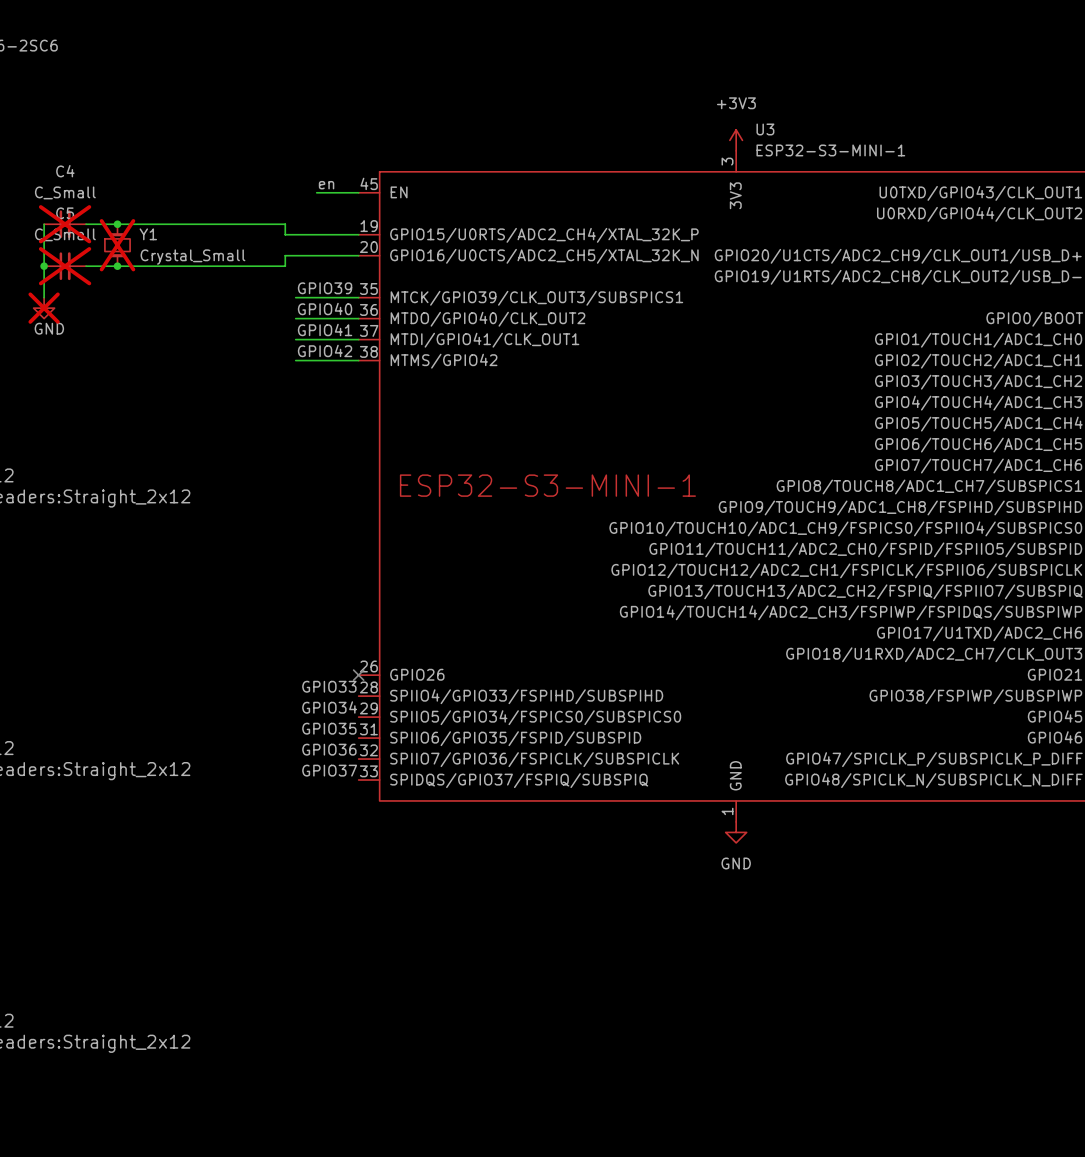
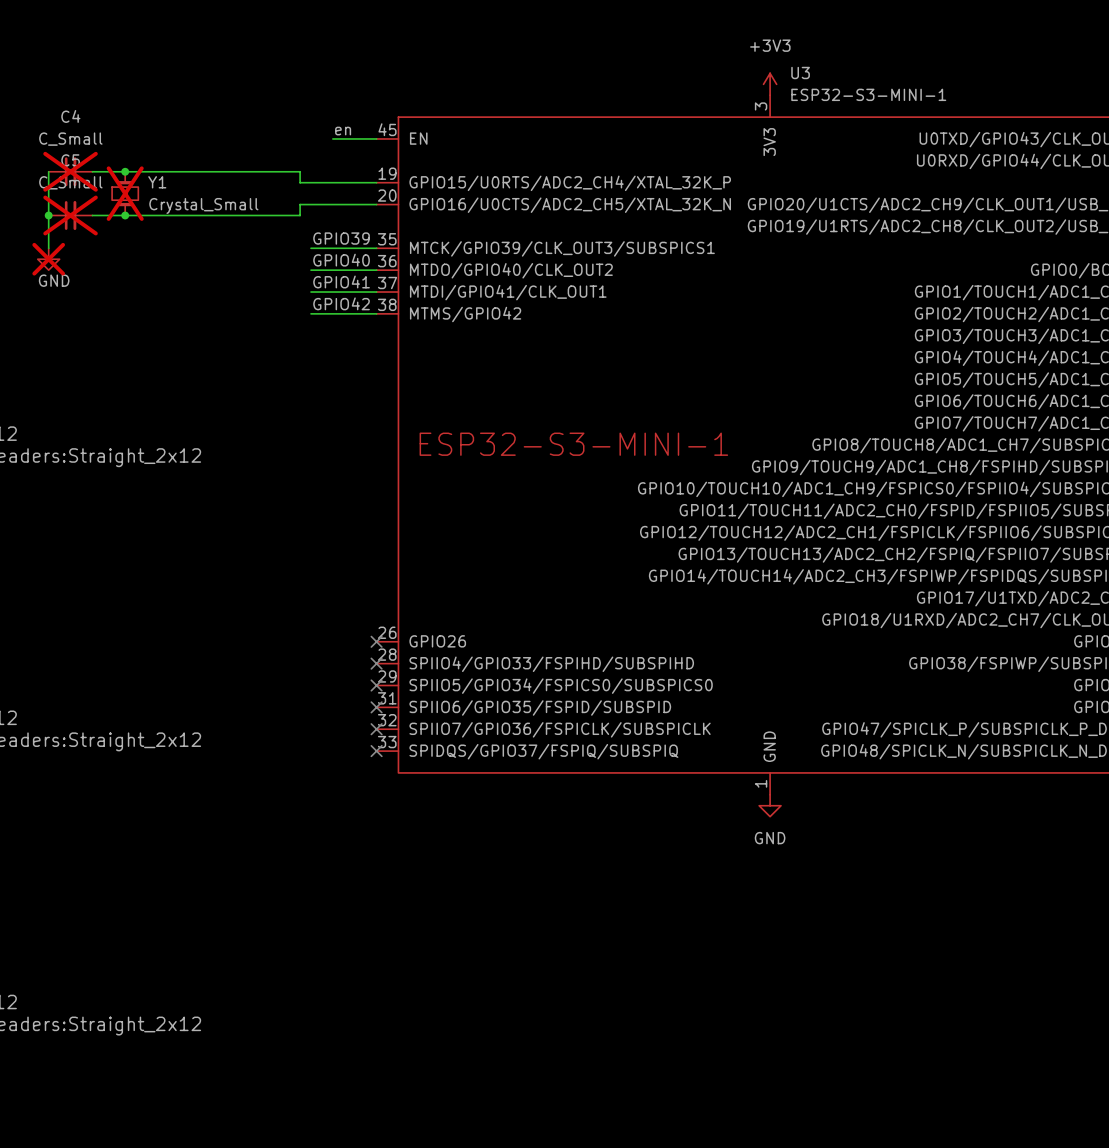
label: GPIO33 (329, 686) -> none
no-connect mark: none -> (376, 663)
label: GPIO34 (329, 707) -> none
no-connect mark: none -> (376, 685)
label: GPIO35 (329, 728) -> none
no-connect mark: none -> (376, 707)
label: GPIO36 (329, 749) -> none
no-connect mark: none -> (376, 729)
label: GPIO37 (329, 770) -> none
no-connect mark: none -> (376, 751)

